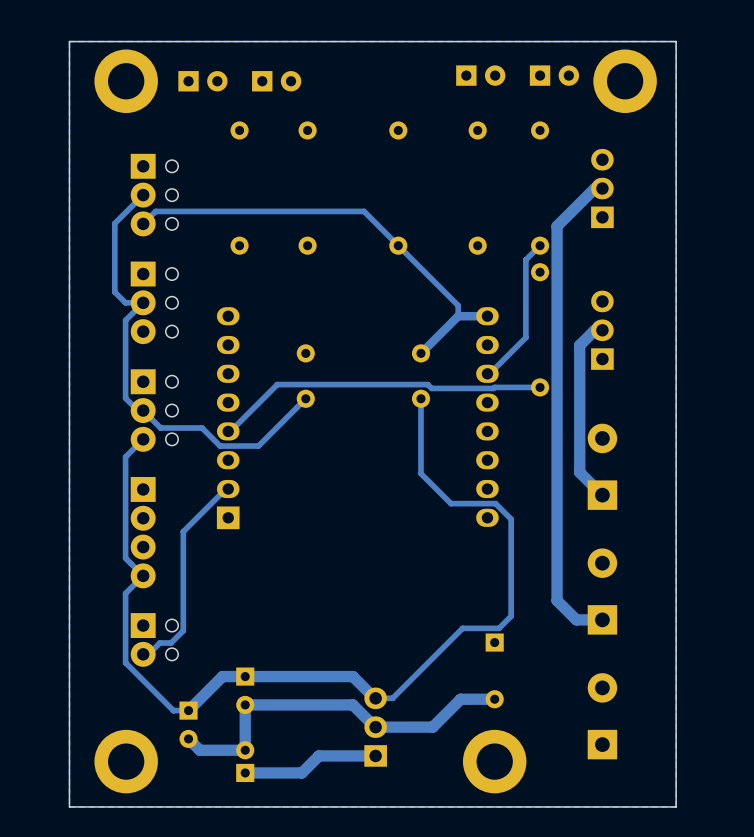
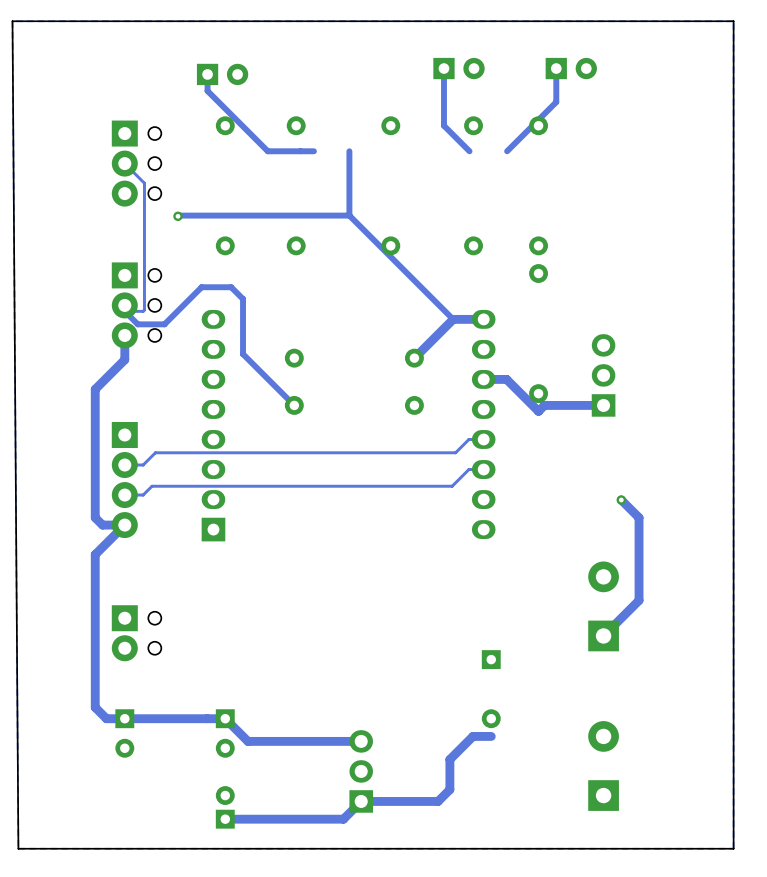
board edge: (676, 41) (676, 806) (69, 806) (69, 41) (676, 41) -> (733, 21) (733, 848) (18, 848) (12, 21) (733, 21)
track: none -> (443, 68) (443, 125) (469, 151)
part position: (480, 75) -> (458, 68)
part position: (554, 75) -> (571, 68)
track: none -> (556, 68) (556, 102) (507, 151)
part: (126, 81) -> none
part: (202, 81) -> none
track: none -> (207, 74) (207, 90) (267, 151) (313, 151)
part: none -> (222, 74)
part: (276, 81) -> none
part: (625, 81) -> none
track: none -> (349, 151) (349, 215)
track: (602, 188) (594, 188) (557, 226) (557, 600) (576, 619) (602, 619) -> none
part: (602, 188) -> none
track: (143, 195) (114, 223) (114, 292) (125, 302) (143, 302) (125, 320) (125, 398) (137, 410) (143, 410) (160, 428) (202, 428) (220, 446) (258, 446) (305, 398) -> (124, 163) (144, 183) (144, 310) (124, 311) (137, 324) (164, 324) (201, 287) (231, 287) (243, 299) (243, 354) (294, 405)
part position: (154, 195) -> (136, 163)
track: none -> (349, 215) (178, 216)
via: none -> (178, 216)
track: (143, 223) (155, 211) (364, 211) (458, 305) (458, 316) -> (349, 215) (453, 319)
track: (540, 245) (525, 259) (525, 337) (489, 373) -> (603, 405) (544, 405) (538, 411) (506, 379) (486, 379)
track: (602, 330) (594, 330) (579, 345) (579, 472) (602, 495) -> none
part position: (602, 330) -> (603, 375)
track: none -> (124, 341) (124, 359) (95, 389) (95, 517) (102, 525) (124, 525) (95, 554) (95, 707) (106, 718) (225, 718) (247, 741) (361, 741)
track: (540, 387) (431, 388) (427, 384) (277, 384) (230, 431) (228, 431) -> none
track: (420, 398) (420, 473) (450, 503) (495, 503) (511, 519) (511, 616) (499, 628) (462, 628) (392, 698) (374, 698) (352, 676) (222, 676) (188, 710) (173, 710) (125, 662) (125, 593) (143, 575) (125, 558) (125, 456) (143, 439) -> none
part: (154, 410) -> none
track: none -> (481, 439) (468, 439) (455, 452) (155, 452) (143, 465) (124, 465)
track: none -> (483, 469) (468, 469) (452, 486) (152, 486) (143, 495) (124, 495)
part: (602, 466) -> none
track: (228, 489) (225, 489) (183, 531) (183, 630) (171, 643) (159, 643) (148, 654) (143, 654) -> none
track: none -> (621, 500) (639, 517) (639, 600) (609, 630) (603, 630)
via: none -> (621, 500)
part position: (143, 532) -> (124, 480)
part position: (154, 639) -> (136, 633)
part position: (245, 690) -> (225, 733)
track: (494, 699) (460, 699) (432, 727) (375, 727) (352, 704) (245, 704) (245, 750) (199, 750) (188, 738) -> none
part: none -> (124, 733)
track: none -> (491, 736) (472, 736) (449, 759) (449, 789) (438, 801) (361, 801) (343, 819) (225, 819)
part position: (602, 716) -> (603, 765)
part: (188, 724) -> none
part position: (375, 727) -> (361, 771)
track: (375, 755) (318, 755) (301, 772) (245, 772) -> none
part: (126, 761) -> none
part position: (245, 761) -> (225, 807)
part: (494, 761) -> none

